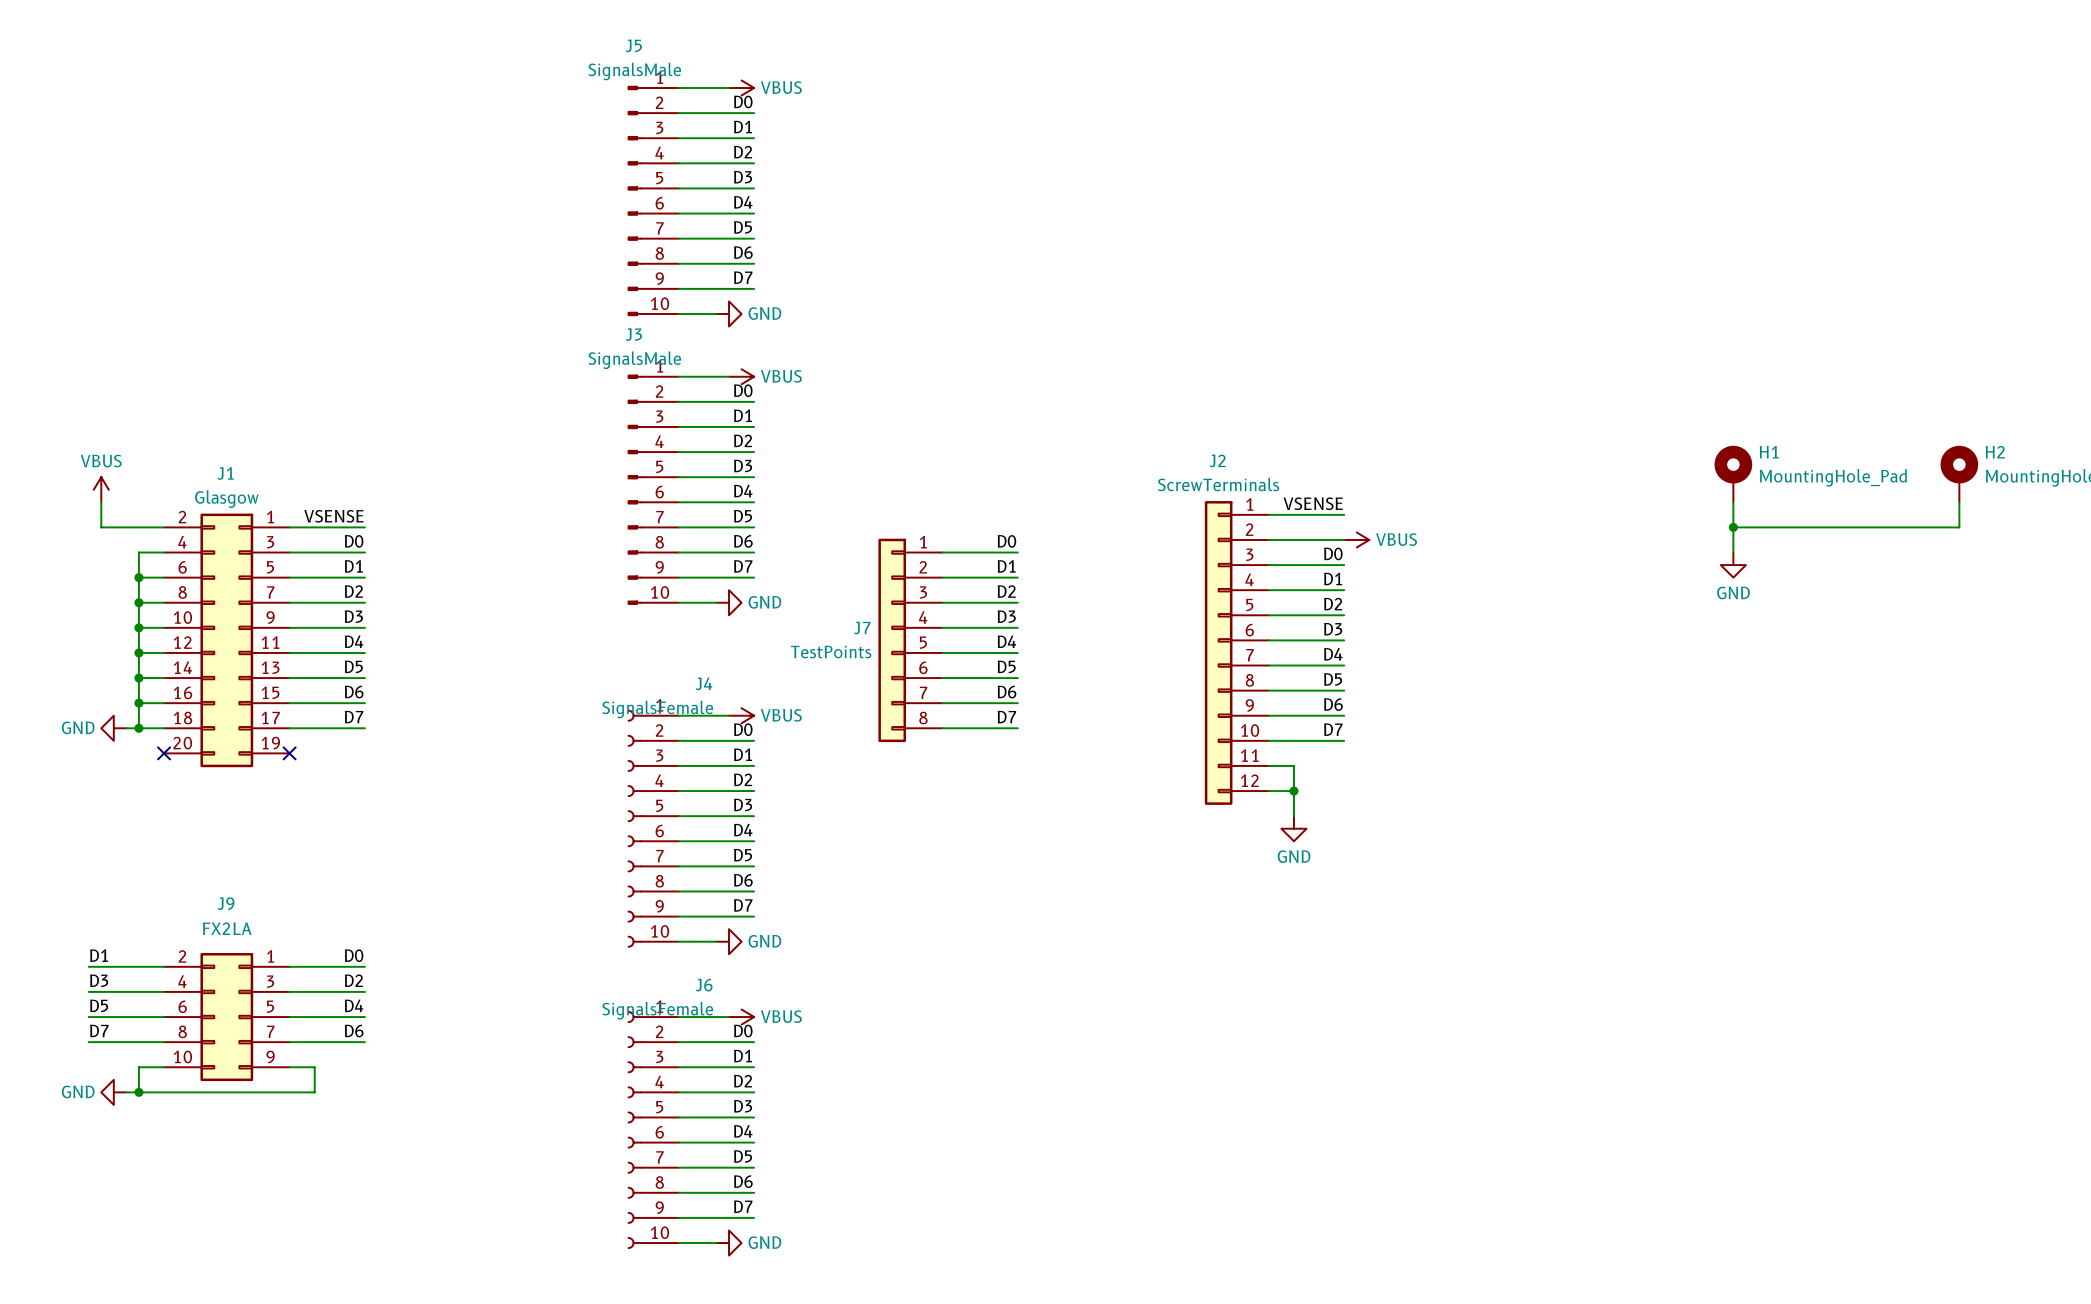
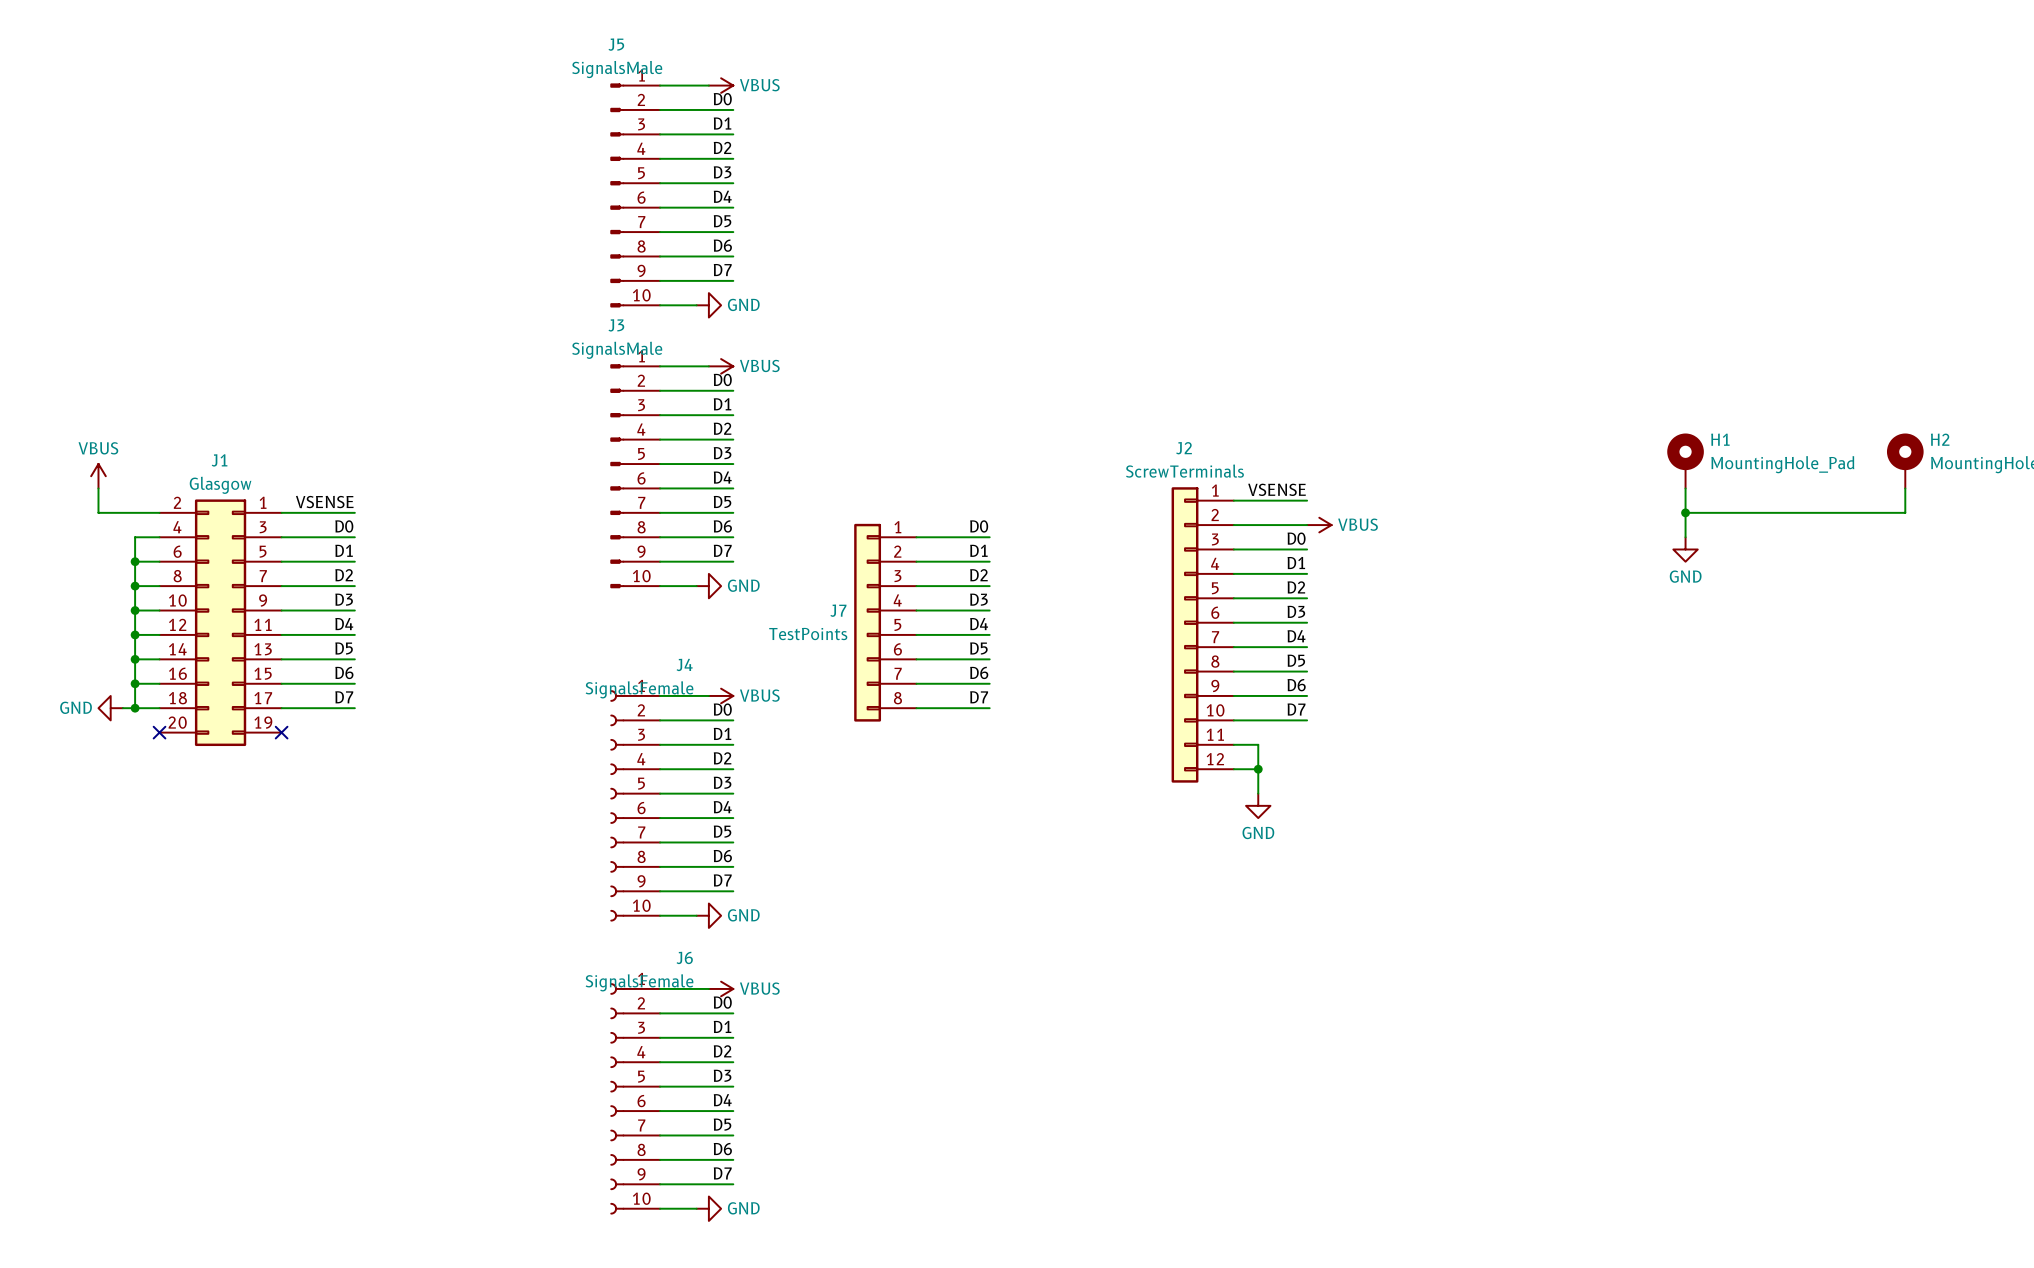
label: D1 (99, 955) -> none
label: D0 (354, 955) -> none
wire: (88, 966) (164, 966) -> none
wire: (289, 966) (364, 966) -> none
label: D3 (99, 980) -> none
label: D2 (353, 980) -> none
wire: (88, 991) (164, 991) -> none
wire: (289, 991) (364, 991) -> none
label: D5 (99, 1005) -> none
label: D4 (354, 1005) -> none
wire: (88, 1017) (164, 1017) -> none
J9: FX2LA (226, 1017) -> none
wire: (289, 1017) (364, 1017) -> none
label: D7 (99, 1030) -> none
label: D6 (354, 1031) -> none
wire: (88, 1042) (164, 1042) -> none
wire: (289, 1042) (364, 1042) -> none
wire: (164, 1067) (138, 1067) (138, 1092) -> none
wire: (289, 1067) (314, 1067) (314, 1092) (126, 1092) -> none
power symbol: GND (113, 1092) -> none
junction: (138, 1092) -> none

